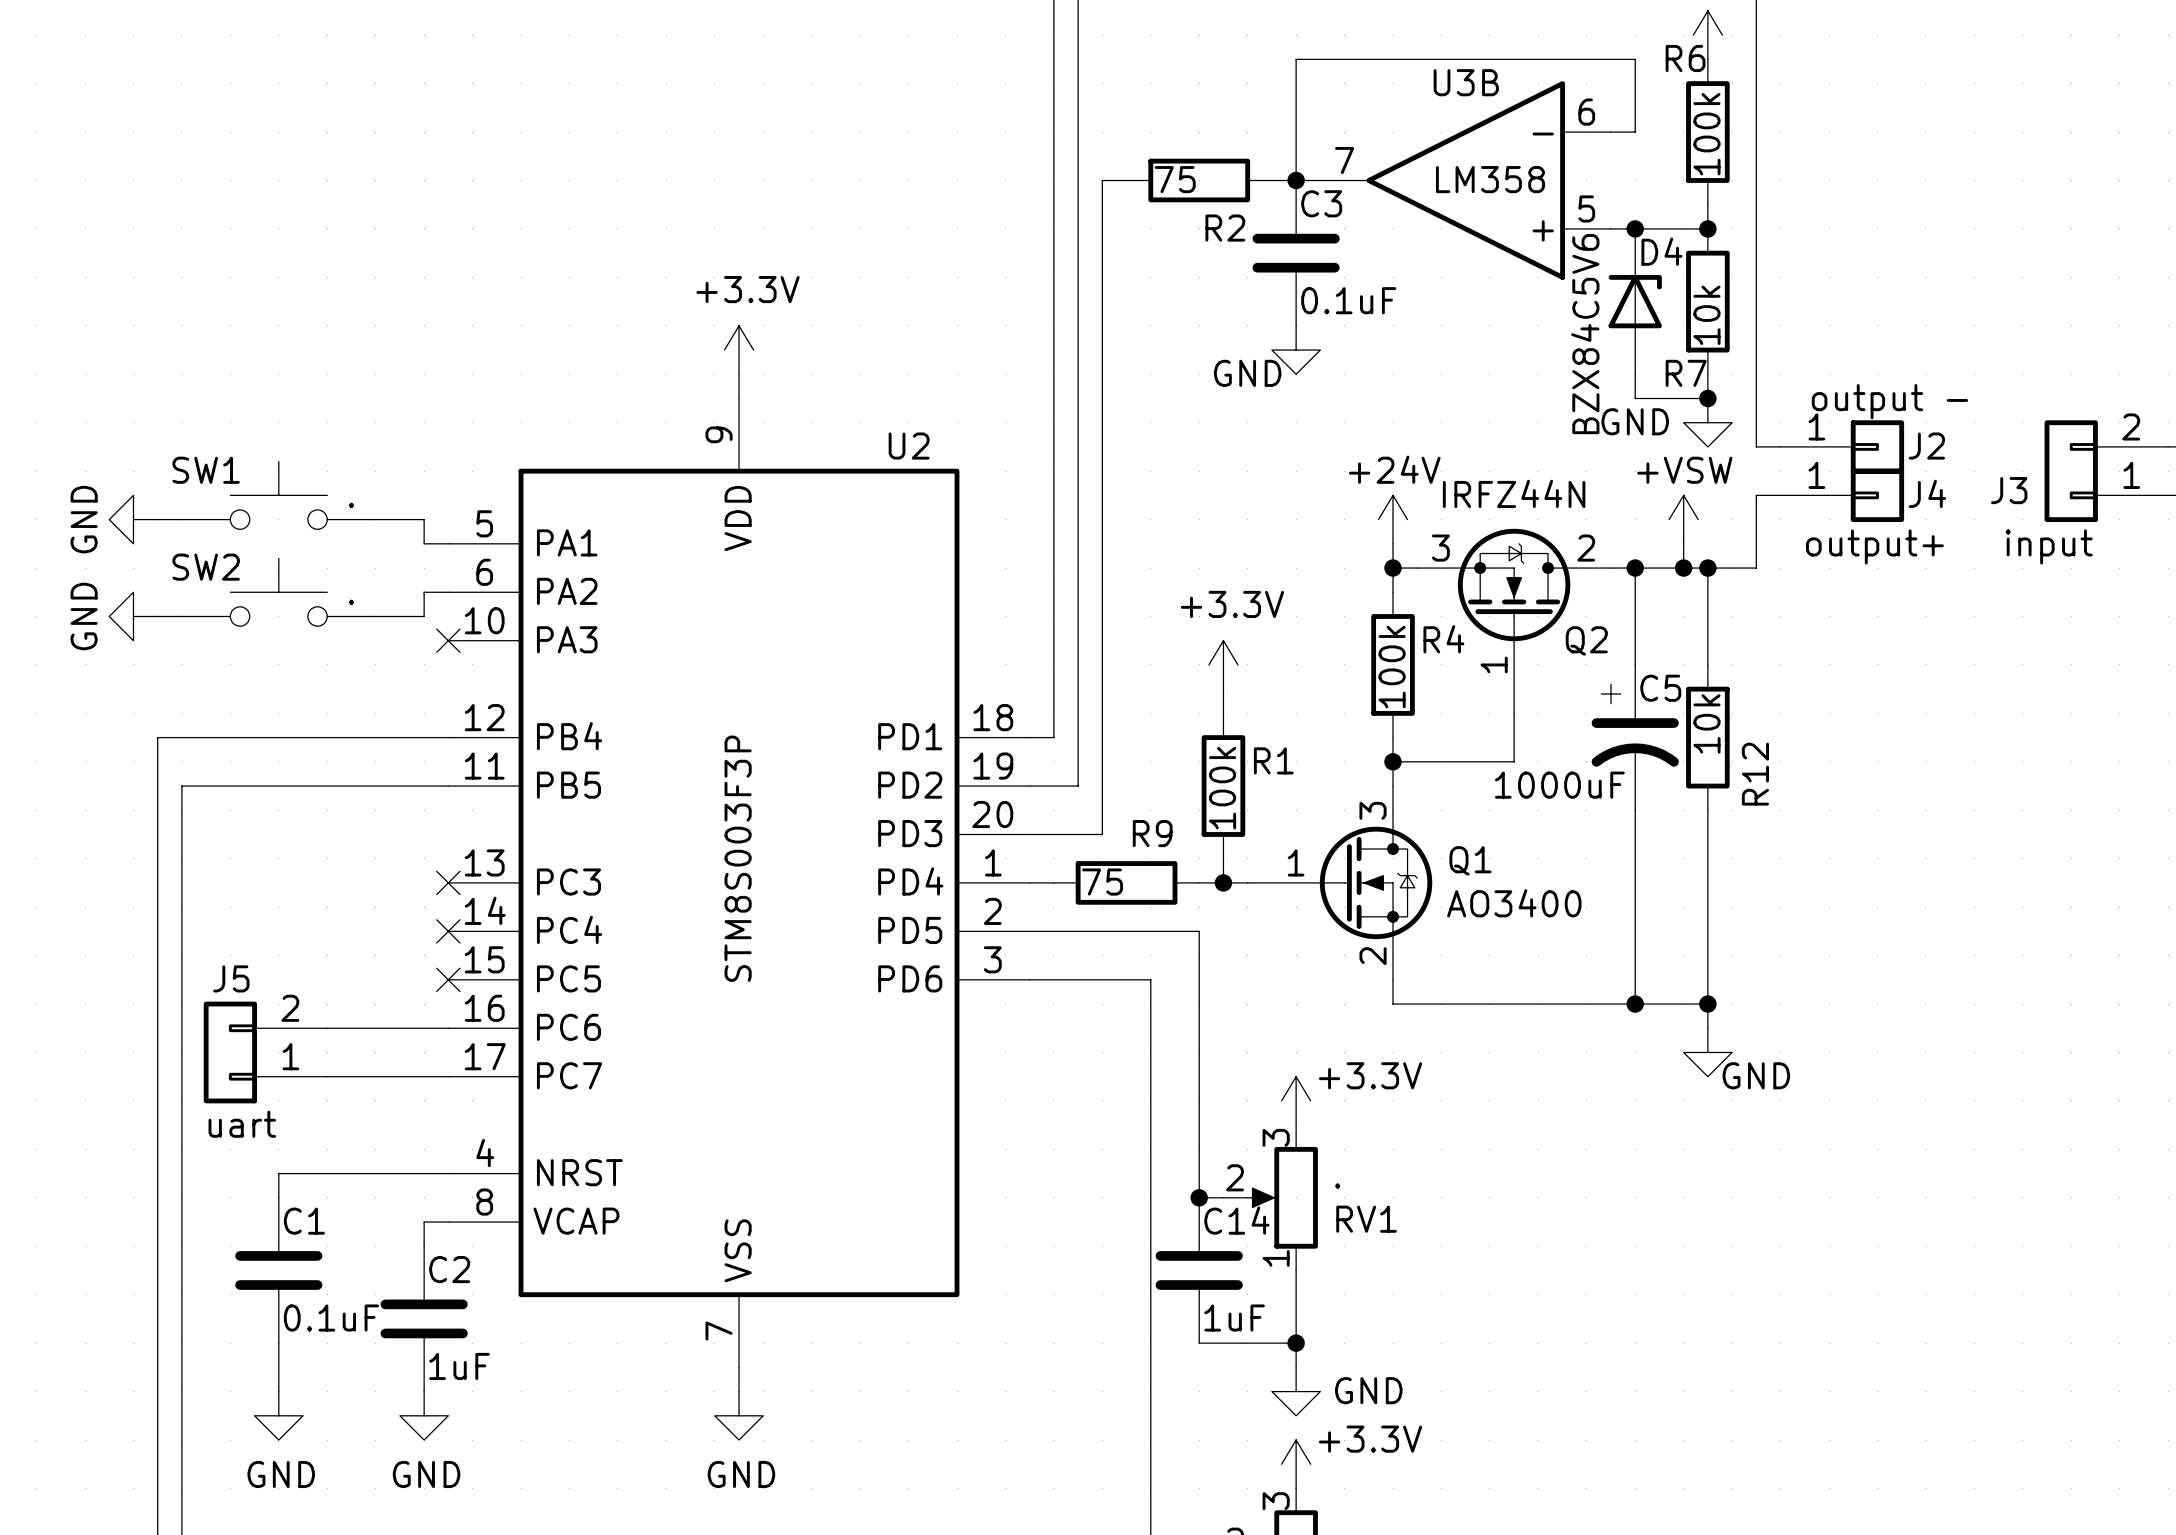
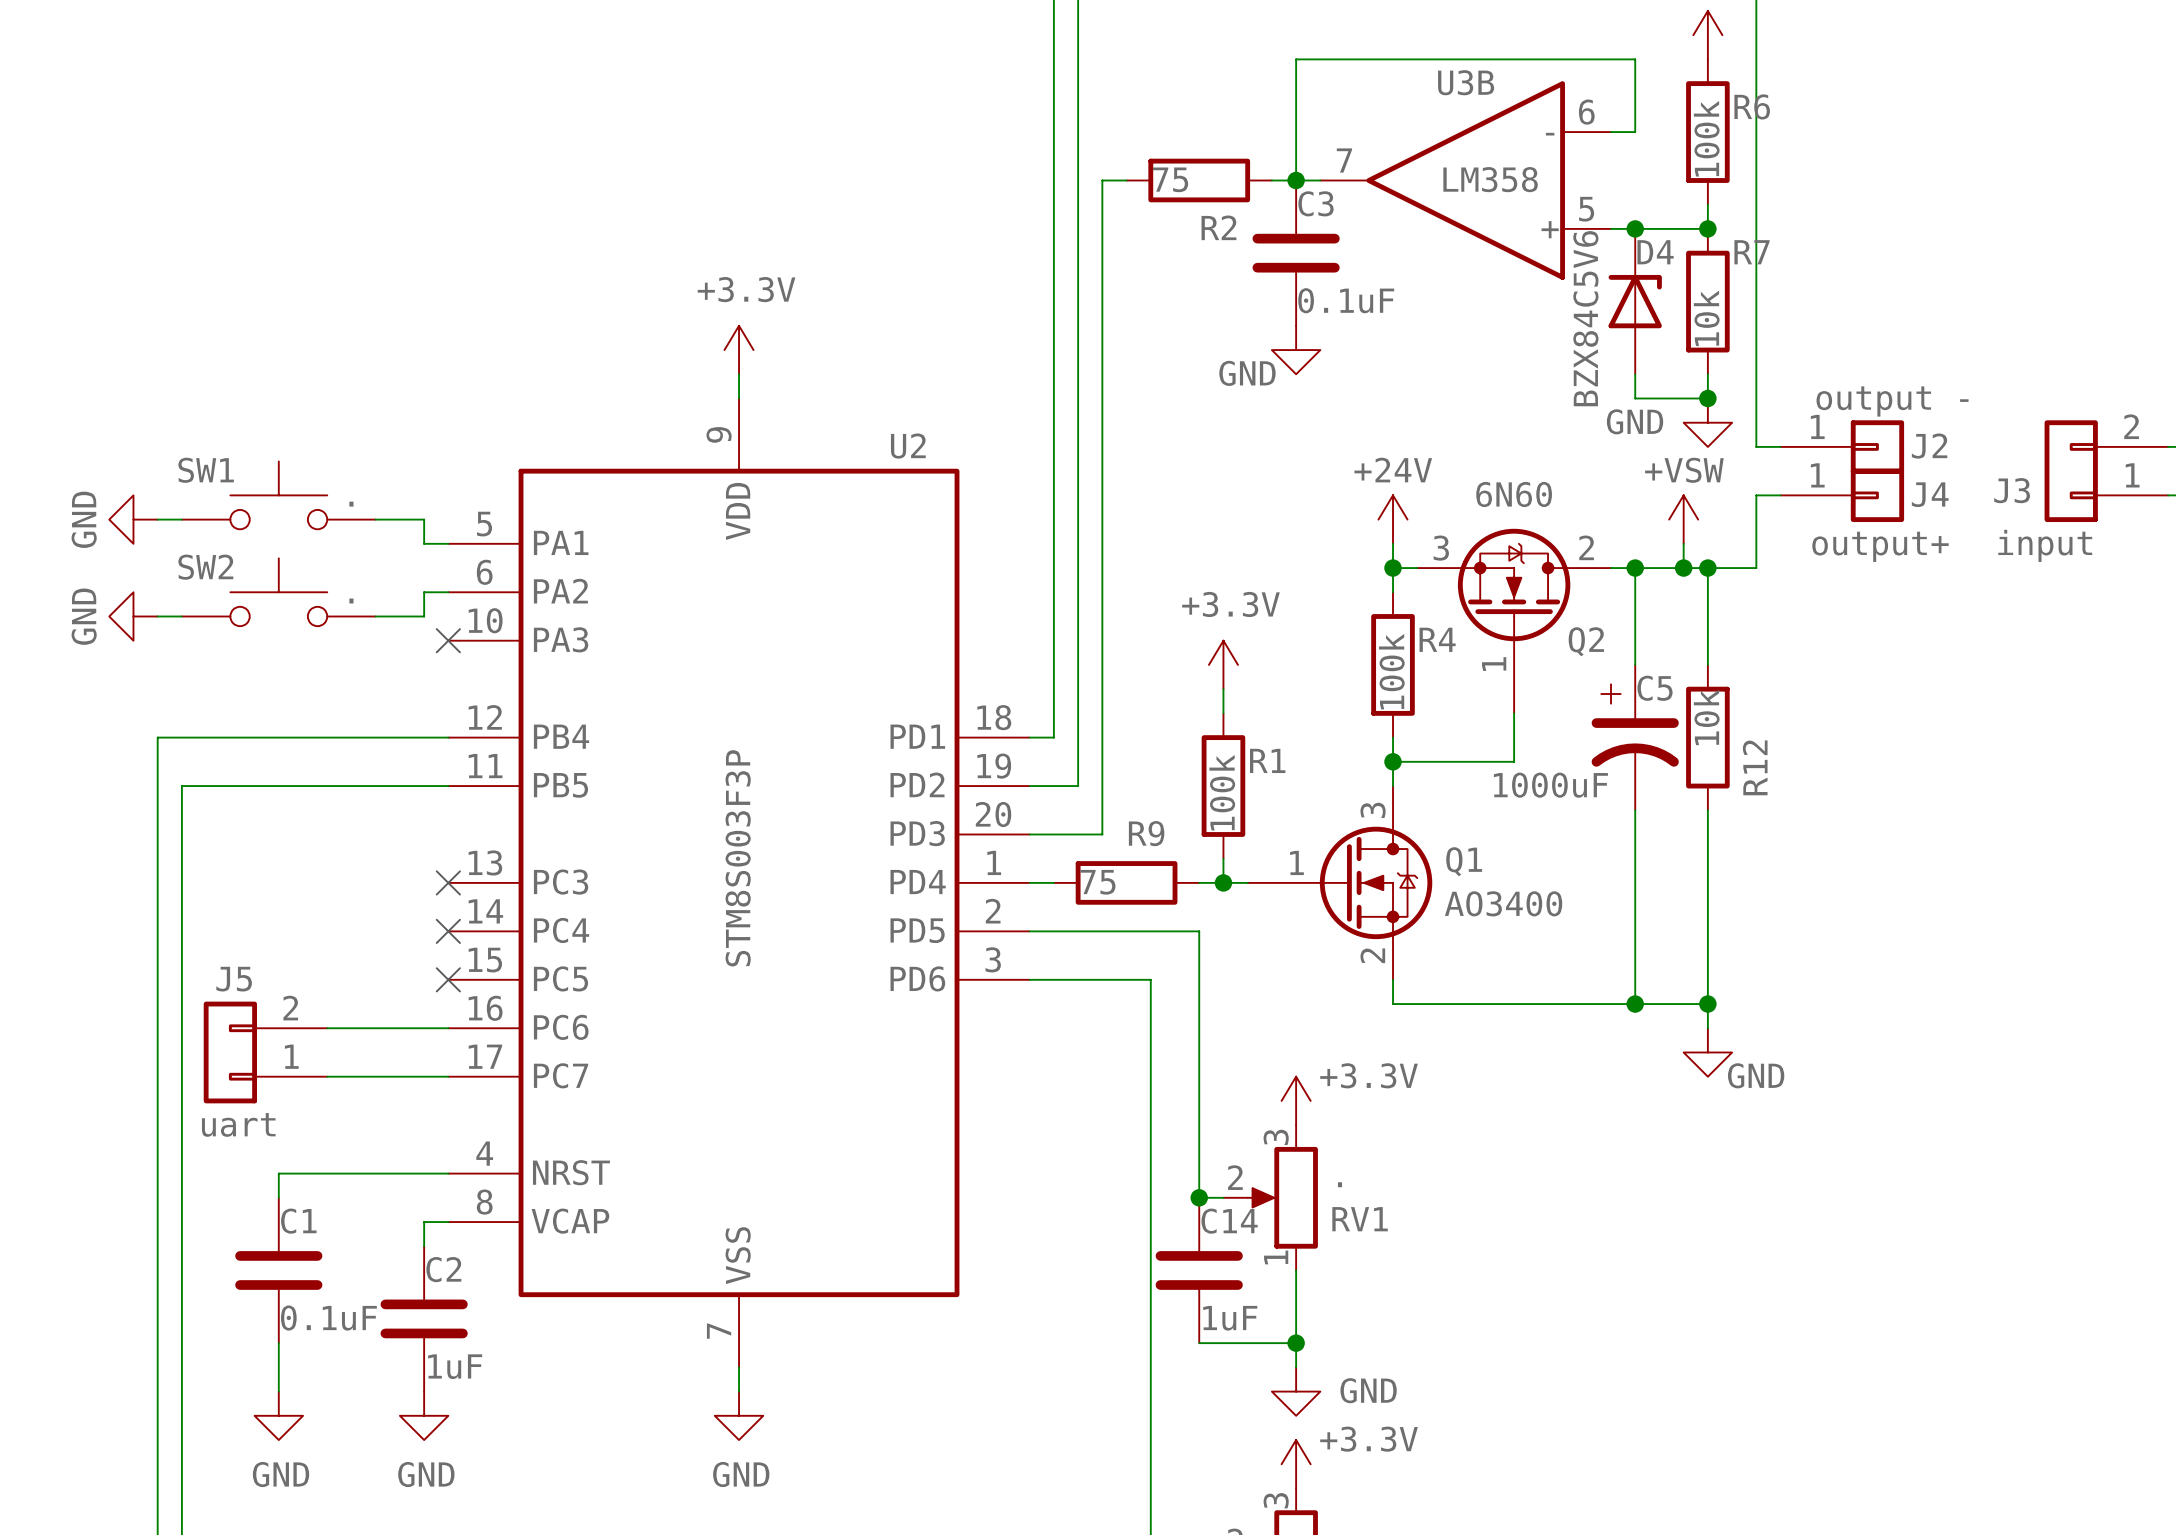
R6 name position: R6 (1685, 58) -> R6 (1752, 106)
R7 name position: R7 (1686, 373) -> R7 (1752, 252)
Q2 value: IRFZ44N (1514, 493) -> 6N60 (1514, 494)

